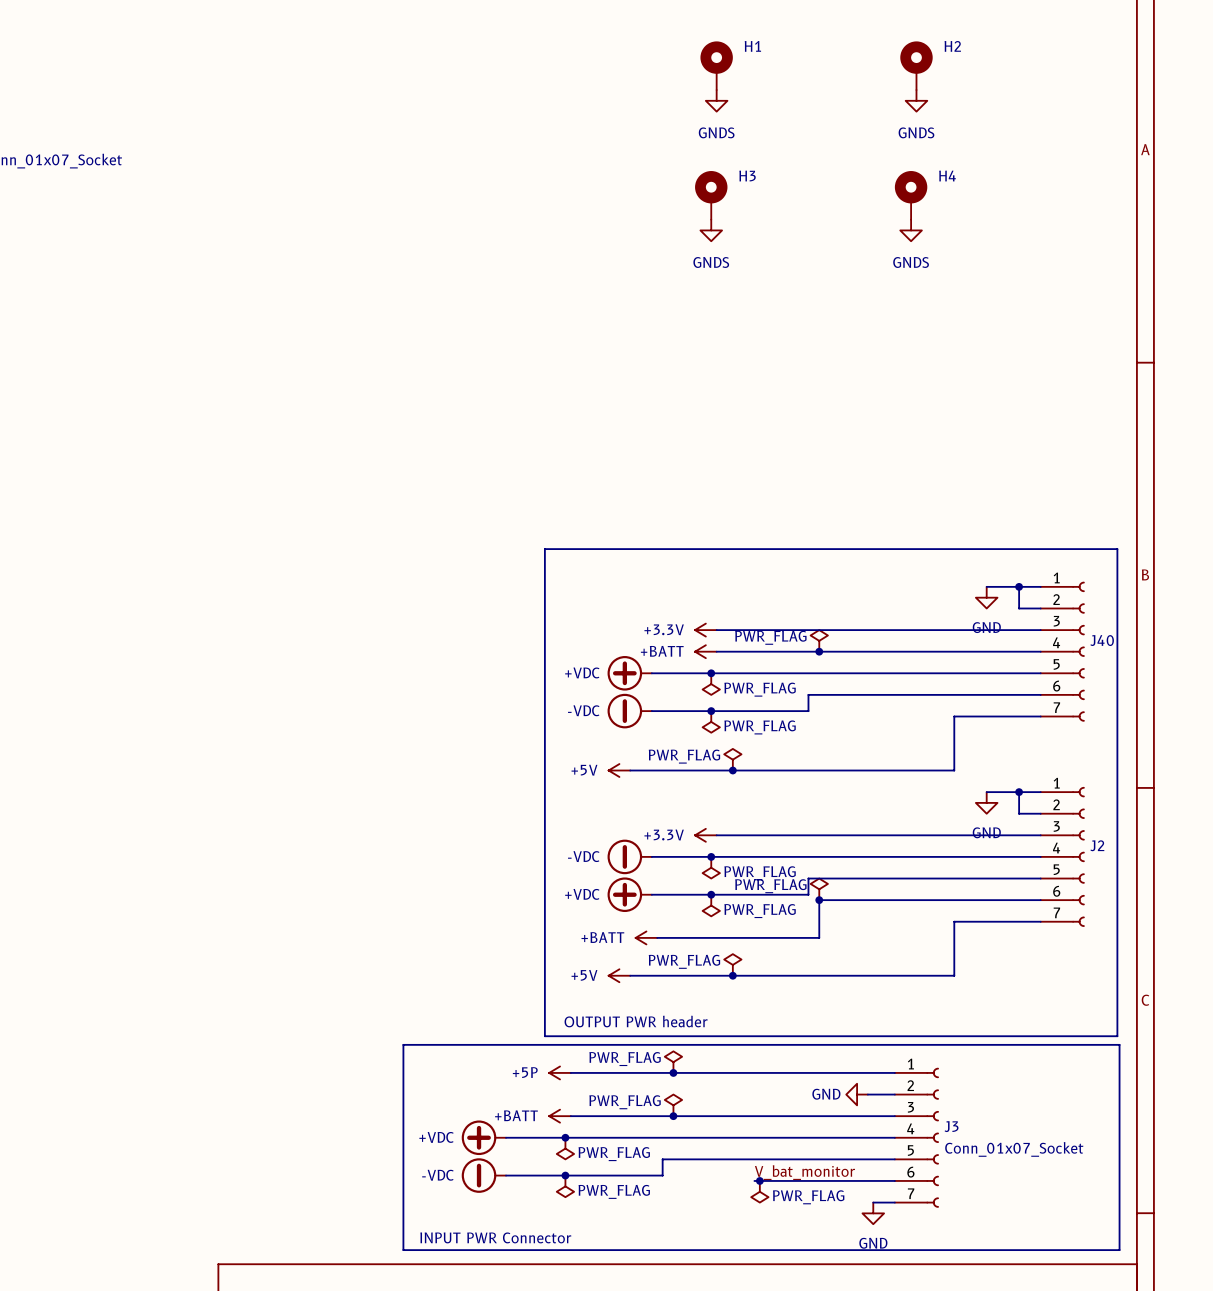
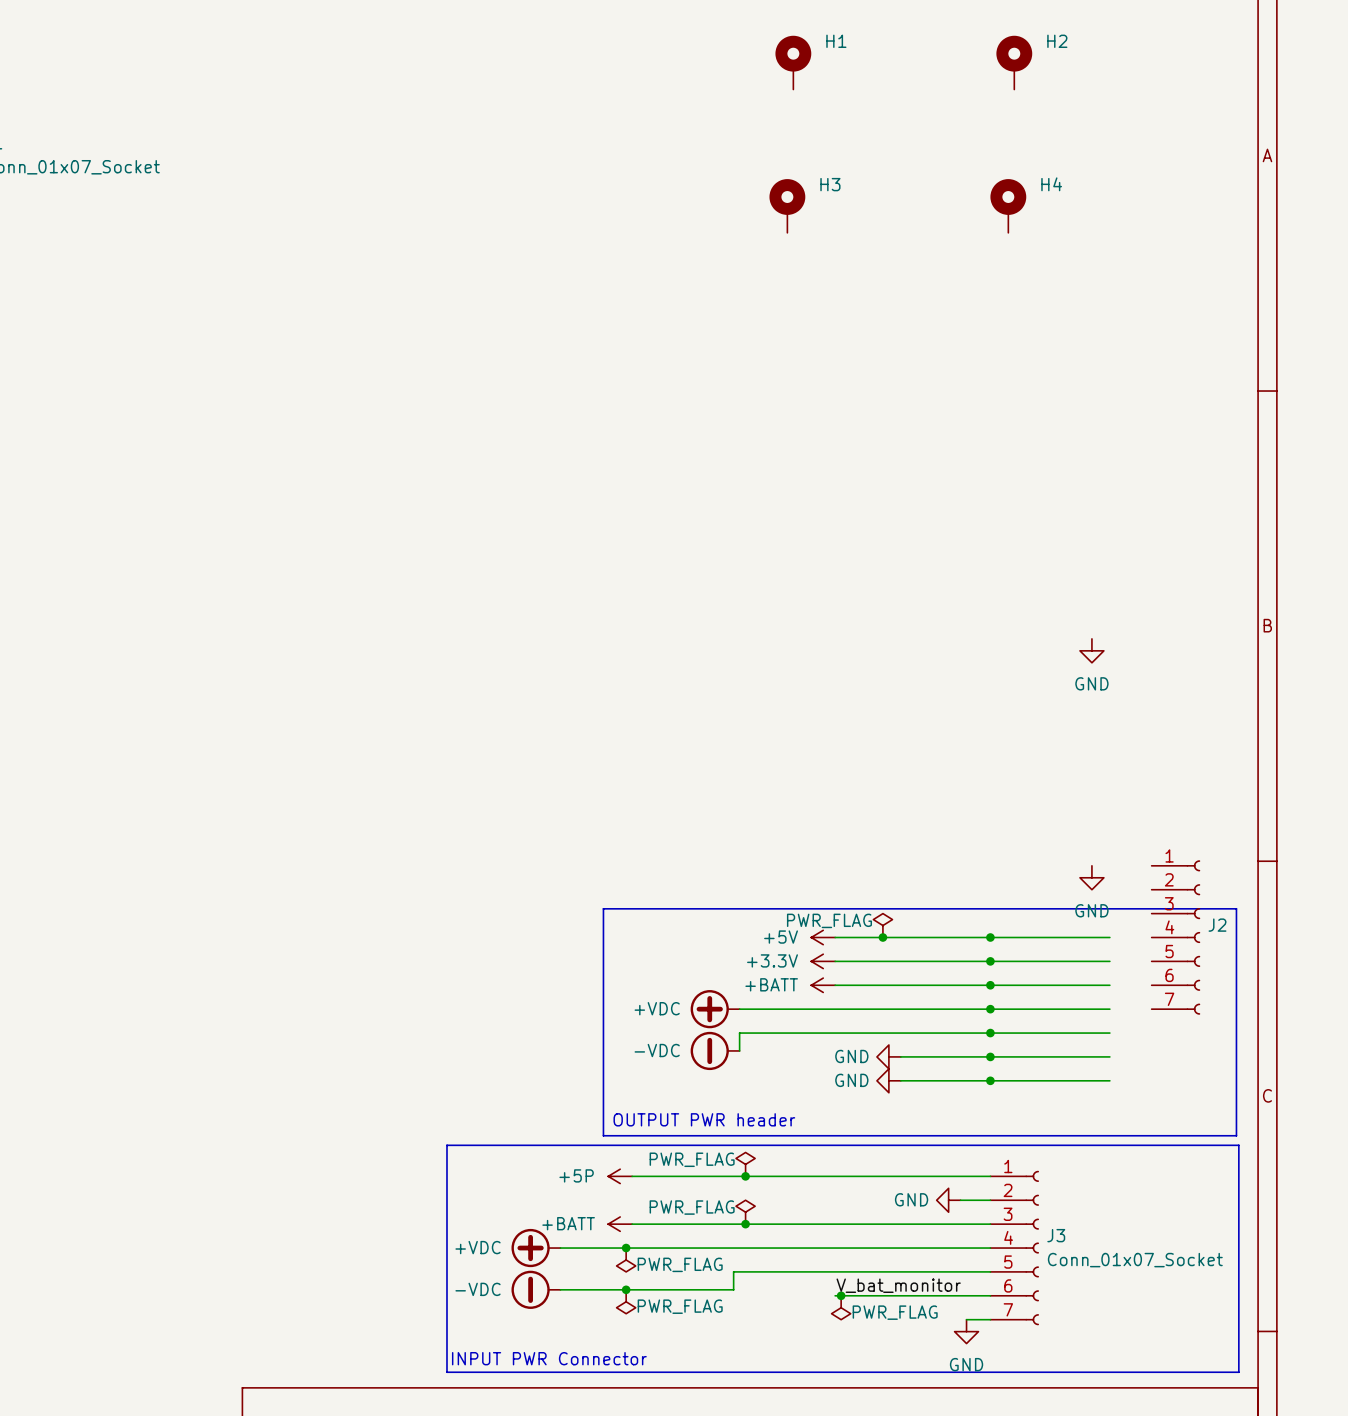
power symbol: GNDS (716, 100) -> none
power symbol: GNDS (916, 100) -> none
power symbol: GNDS (711, 230) -> none
power symbol: GNDS (911, 230) -> none
wire: (986, 586) (1040, 586) -> none
wire: (1019, 586) (1019, 608) (1040, 608) -> none
junction: (1019, 586) -> none
power symbol: +3.3V (705, 630) -> none
wire: (716, 630) (1040, 630) -> none
power symbol: PWR_FLAG (819, 640) -> none
power symbol: +BATT (705, 651) -> none
wire: (716, 651) (1040, 651) -> none
junction: (819, 651) -> none
J40: (1062, 651) -> none
power symbol: +VDC (629, 673) -> none
wire: (651, 673) (1040, 673) -> none
junction: (711, 673) -> none
power symbol: PWR_FLAG (711, 684) -> none
wire: (1040, 694) (808, 694) (808, 711) (651, 711) -> none
power symbol: -VDC (629, 711) -> none
junction: (711, 711) -> none
wire: (1040, 716) (954, 716) (954, 770) (630, 770) -> none
power symbol: PWR_FLAG (711, 721) -> none
power symbol: PWR_FLAG (732, 759) -> none
power symbol: +5V (619, 770) -> none
junction: (732, 770) -> none
wire: (986, 792) (1040, 792) -> none
wire: (1019, 792) (1019, 813) (1040, 813) -> none
junction: (1019, 792) -> none
line: (544, 831) (544, 549) (1117, 549) (1117, 831) -> (603, 908) (1236, 908)
power symbol position: +3.3V (705, 835) -> +3.3V (823, 961)
wire: (716, 835) (1040, 835) -> none
power symbol: none -> PWR_FLAG (882, 925)
power symbol position: -VDC (629, 856) -> -VDC (715, 1050)
wire: (651, 856) (754, 856) -> none
junction: (711, 856) -> none
power symbol: none -> +5V (823, 937)
junction: none -> (882, 937)
junction: none -> (990, 937)
wire: (1002, 856) (1040, 856) -> none
power symbol: PWR_FLAG (711, 867) -> none
wire: (808, 878) (808, 894) (651, 894) -> (894, 961) (835, 961)
junction: none -> (990, 961)
wire: (1002, 878) (1040, 878) -> none
power symbol: PWR_FLAG (819, 889) -> none
power symbol position: +VDC (629, 894) -> +VDC (715, 1009)
junction: (711, 894) -> none
wire: (819, 900) (819, 937) (657, 937) -> (906, 985) (835, 985)
junction: (819, 900) -> none
junction: none -> (990, 985)
wire: (1002, 900) (1040, 900) -> none
power symbol: PWR_FLAG (711, 905) -> none
junction: none -> (990, 1009)
wire: (954, 921) (954, 975) (630, 975) -> (1056, 1009) (739, 1009)
wire: (1002, 921) (1040, 921) -> none
power symbol position: +BATT (646, 937) -> +BATT (823, 985)
junction: none -> (990, 1033)
wire: none -> (1109, 1033) (739, 1033) (739, 1050)
power symbol: PWR_FLAG (732, 964) -> none
power symbol: none -> GND (888, 1056)
wire: none -> (900, 1056) (1109, 1056)
junction: none -> (990, 1056)
power symbol: +5V (619, 975) -> none
junction: (732, 975) -> none
power symbol: none -> GND (888, 1080)
wire: none -> (900, 1080) (1109, 1080)
junction: none -> (990, 1080)

